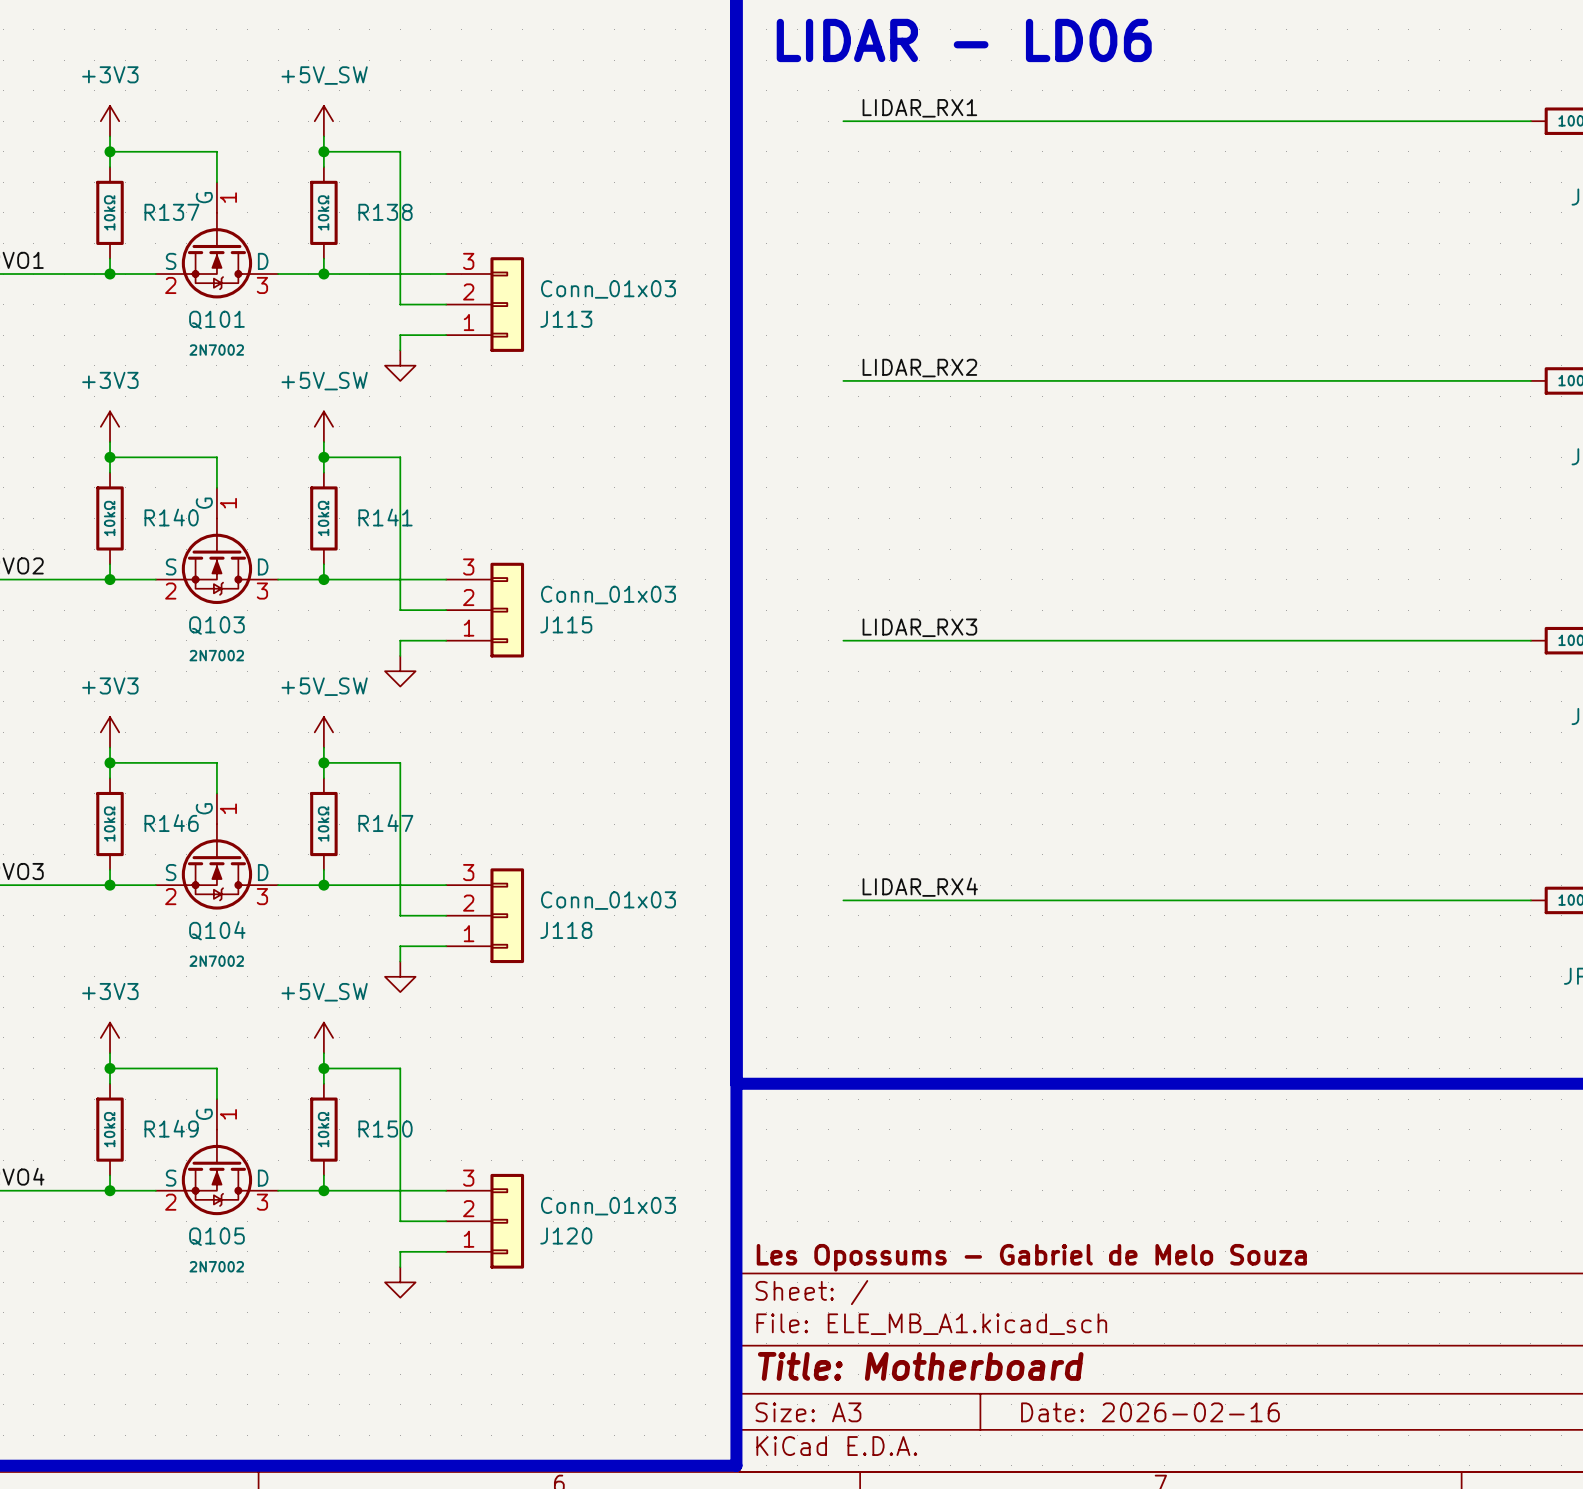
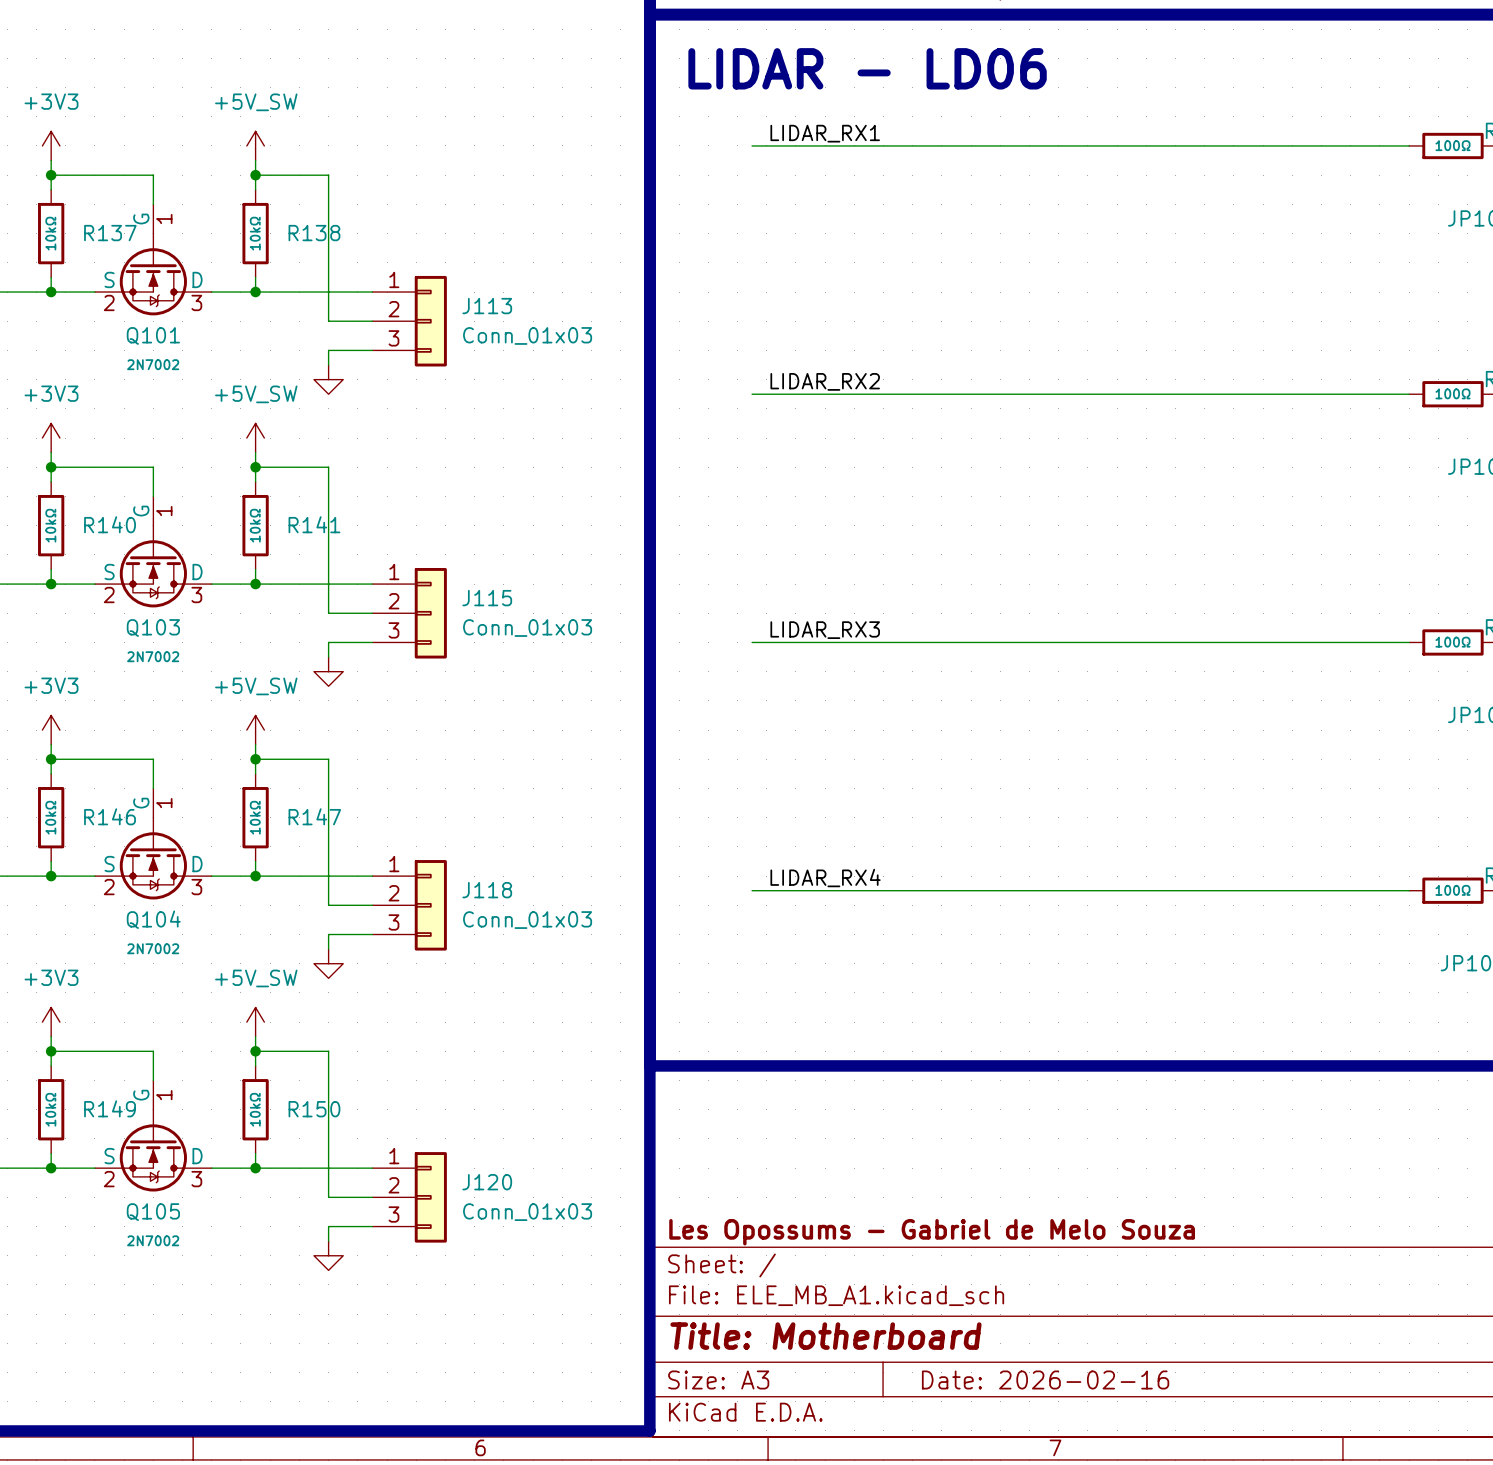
J113 flip: as is (507, 304) -> up-down (430, 321)
J115 flip: as is (507, 610) -> up-down (430, 613)
J118 flip: as is (507, 915) -> up-down (430, 905)
J120 flip: as is (507, 1221) -> up-down (430, 1197)

